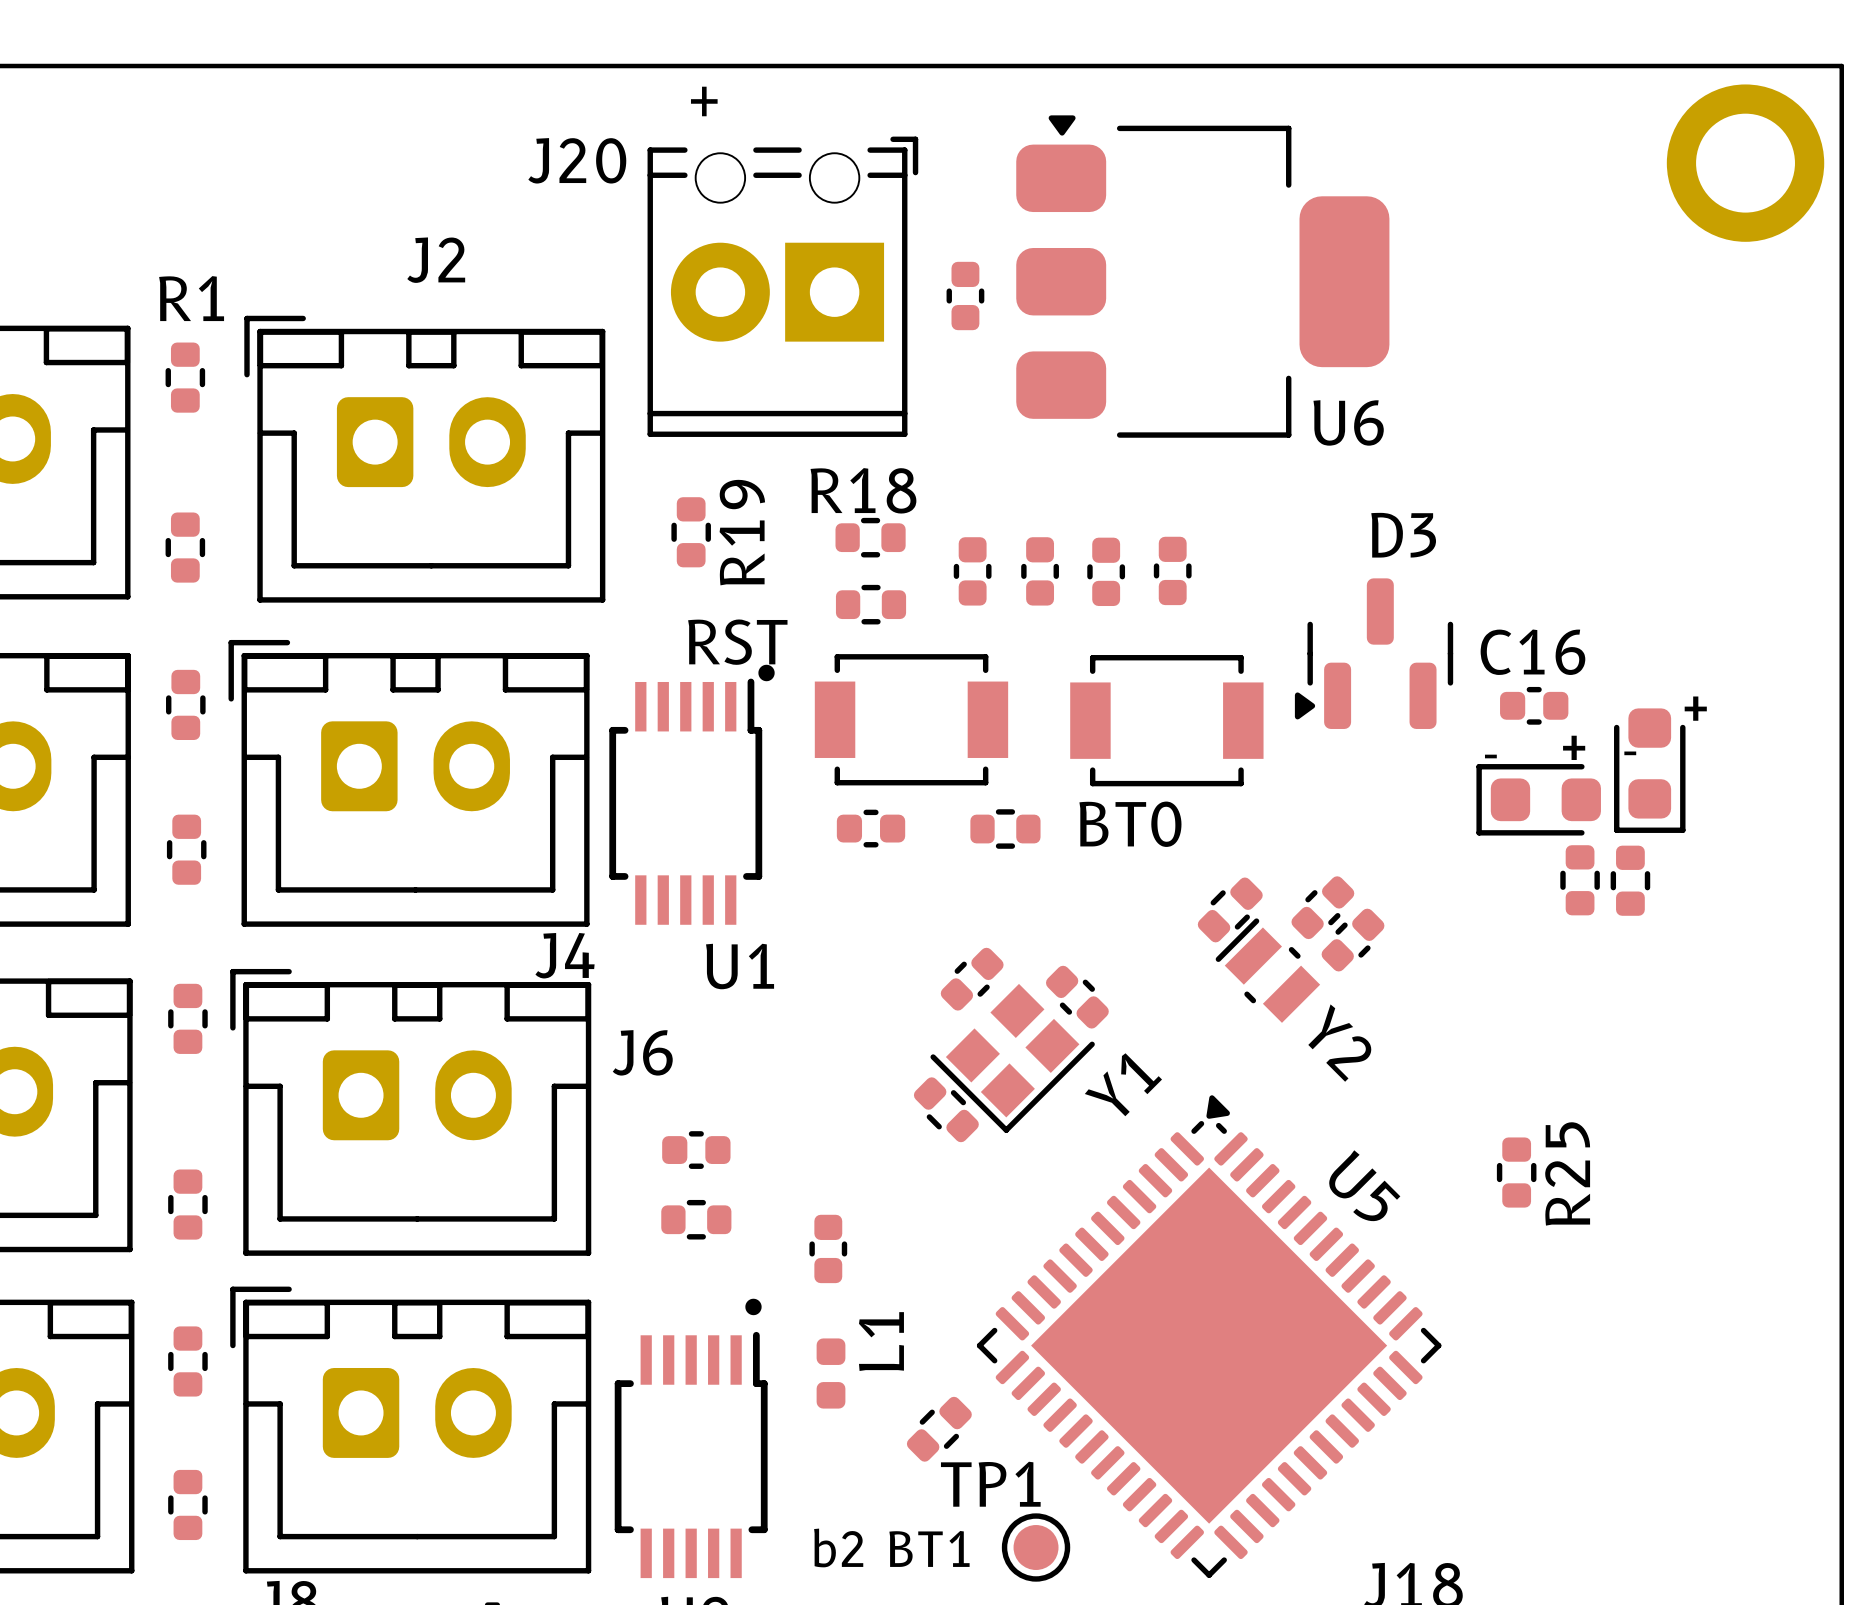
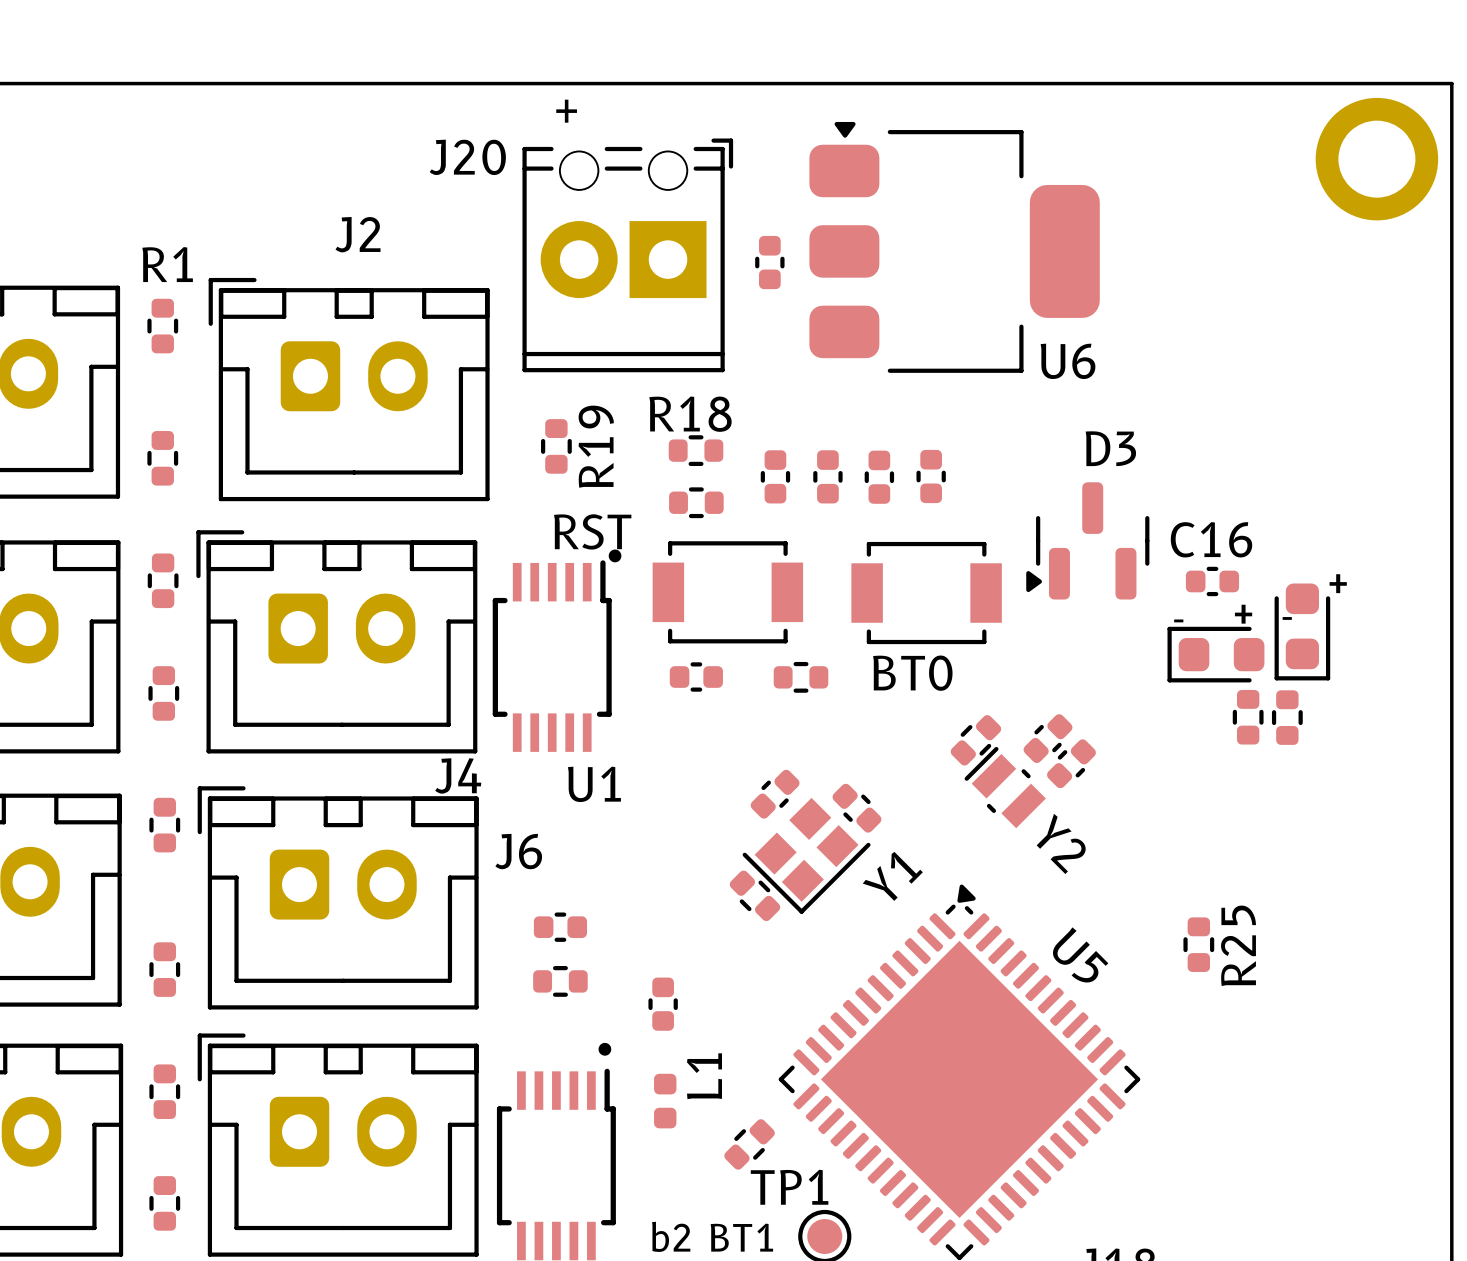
text position: BT0 (1130, 824) -> BT0 (912, 673)

